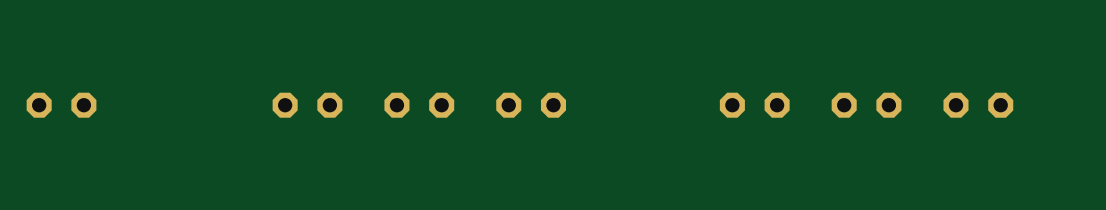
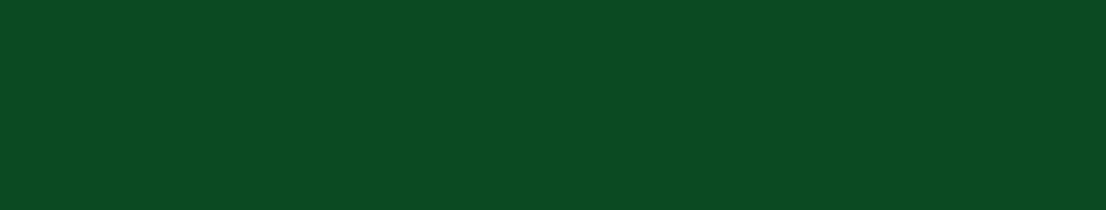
part: (61, 105) -> none
part: (307, 105) -> none
part: (419, 105) -> none
part: (531, 105) -> none
part: (754, 105) -> none
part: (866, 105) -> none
part: (978, 105) -> none

